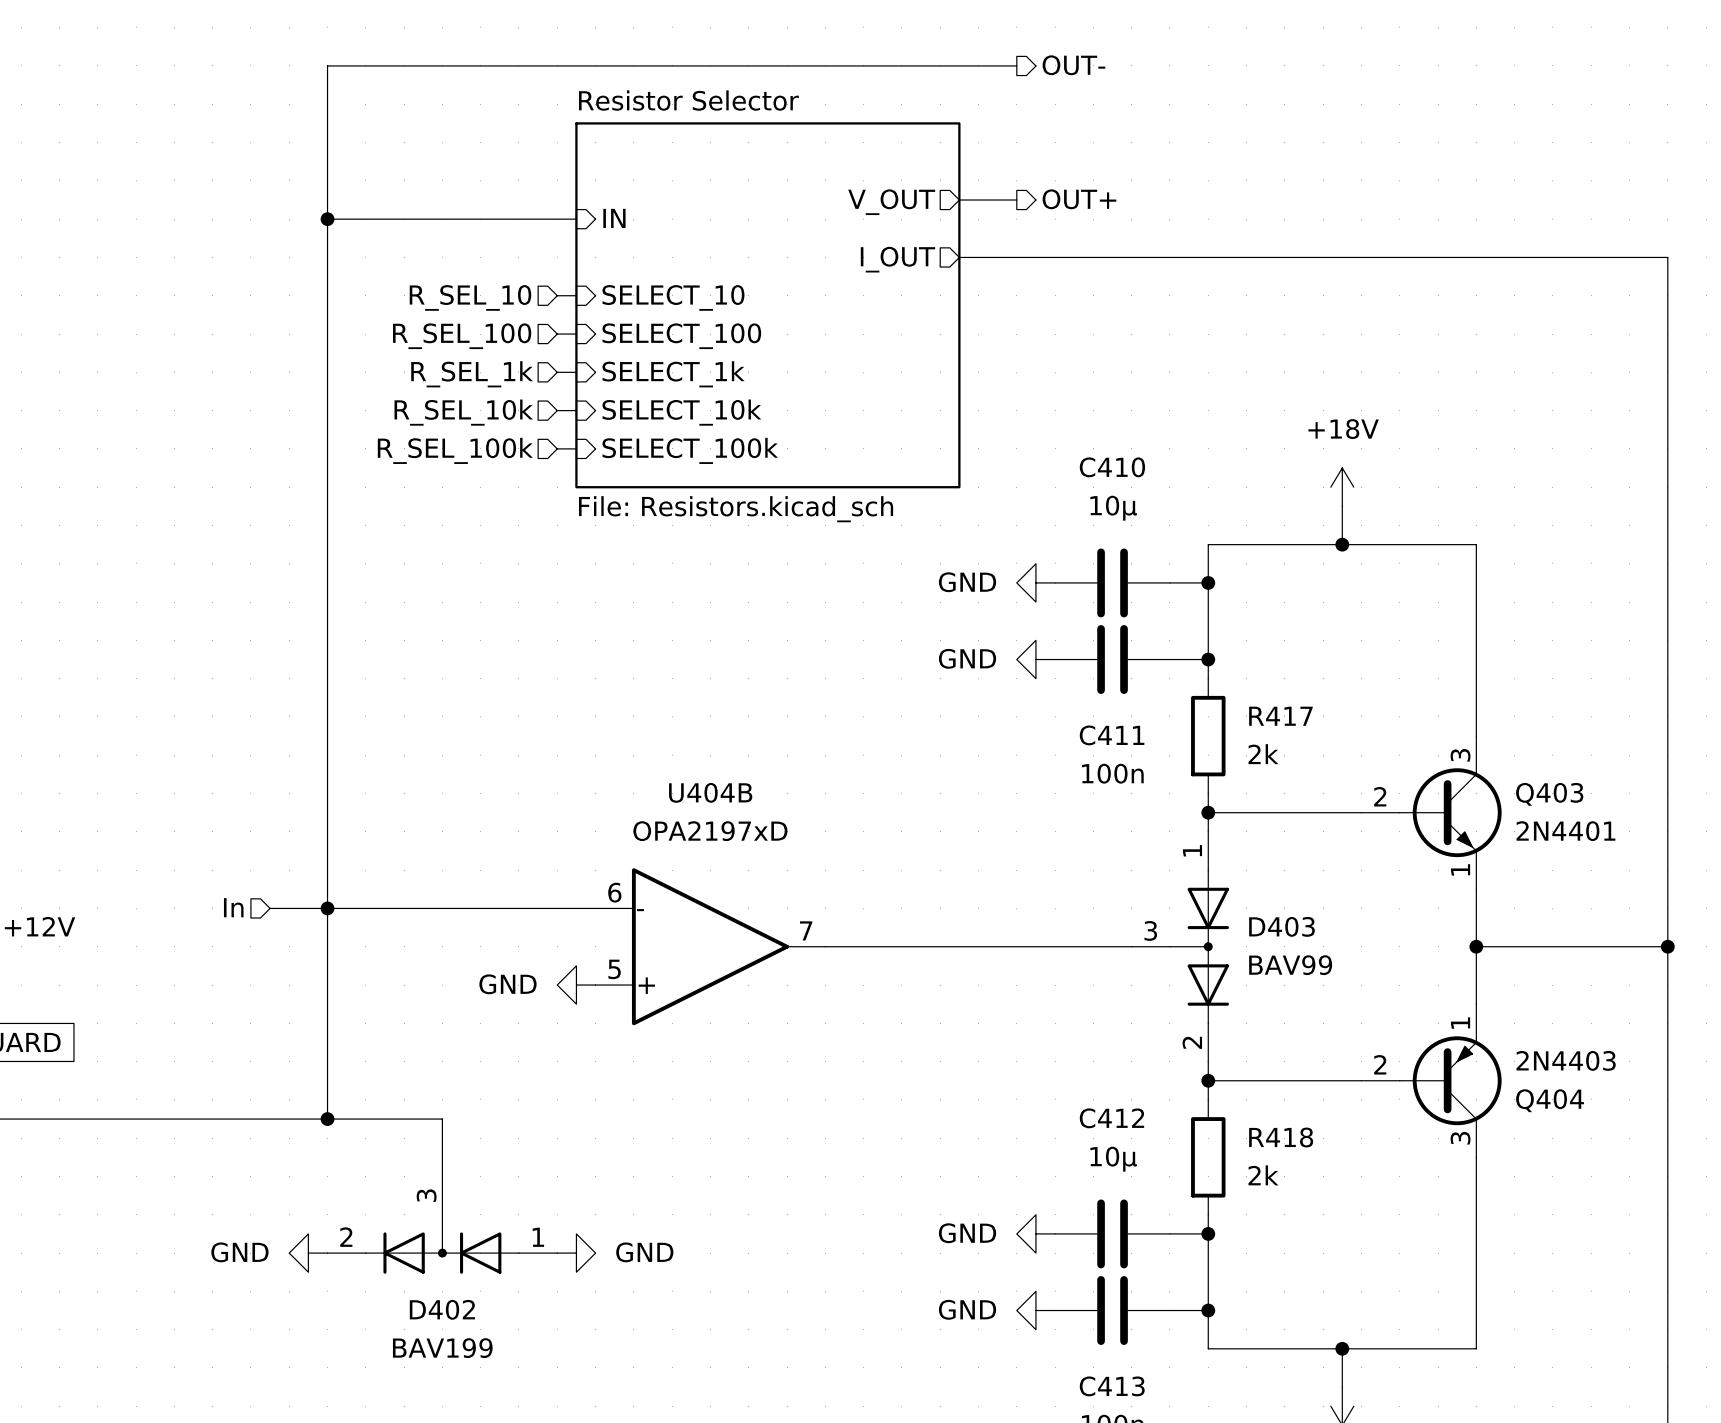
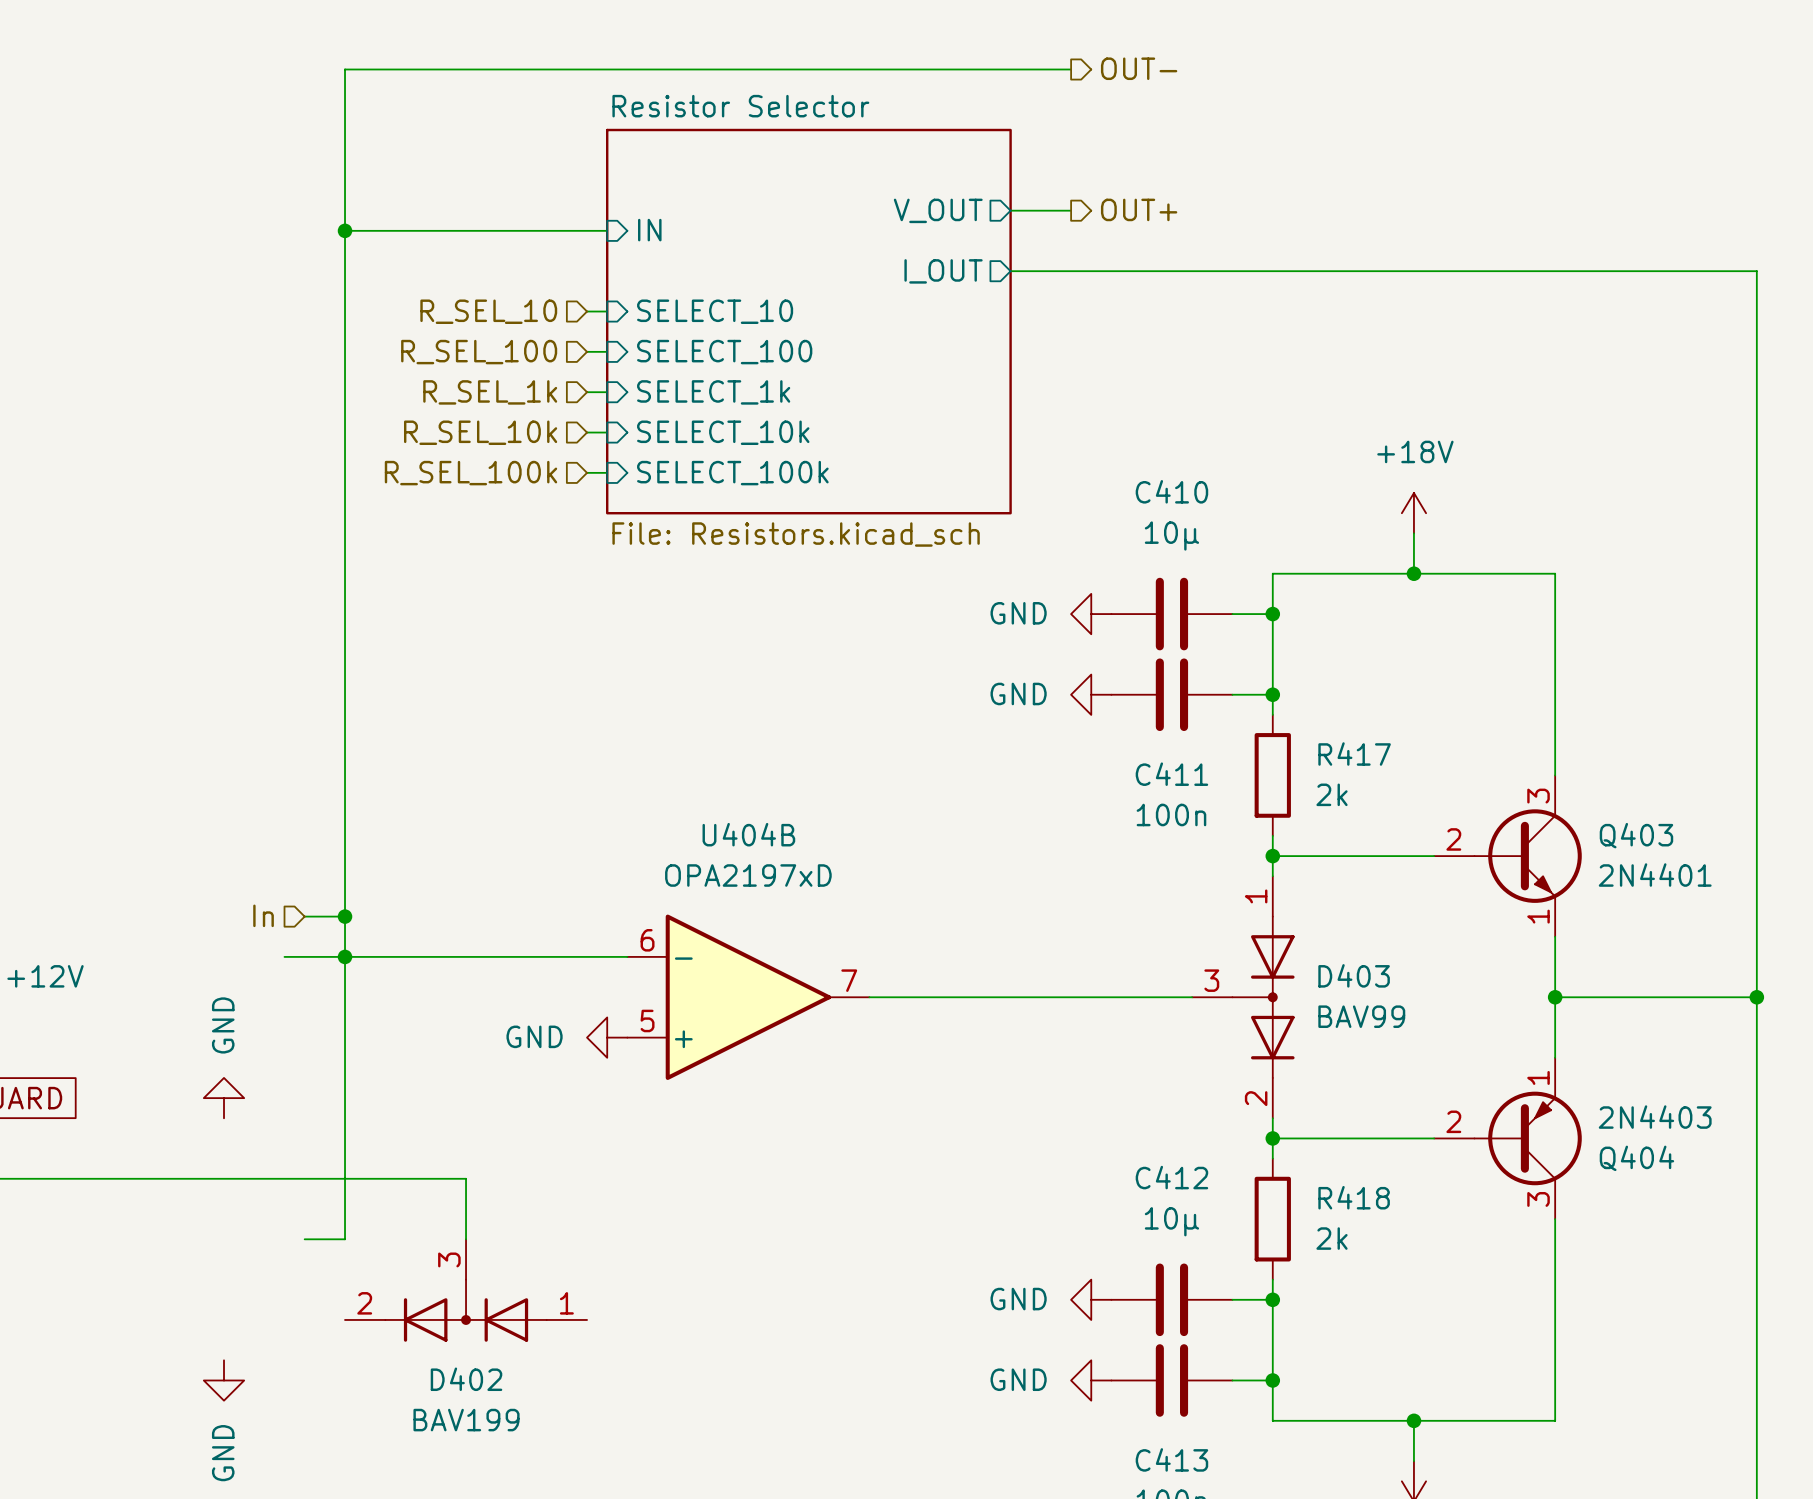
wire: none -> (304, 916) (345, 916)
junction: none -> (345, 916)
hierarchical label position: In (233, 907) -> In (263, 915)
power symbol: none -> GND (224, 1098)
wire: none -> (345, 1178) (345, 1239) (304, 1239)
junction: (327, 1119) -> none
power symbol rotation: 0° (308, 1253) -> 90° counterclockwise (224, 1380)
power symbol position: GND (308, 1253) -> GND (224, 1380)
power symbol: GND (576, 1253) -> none

